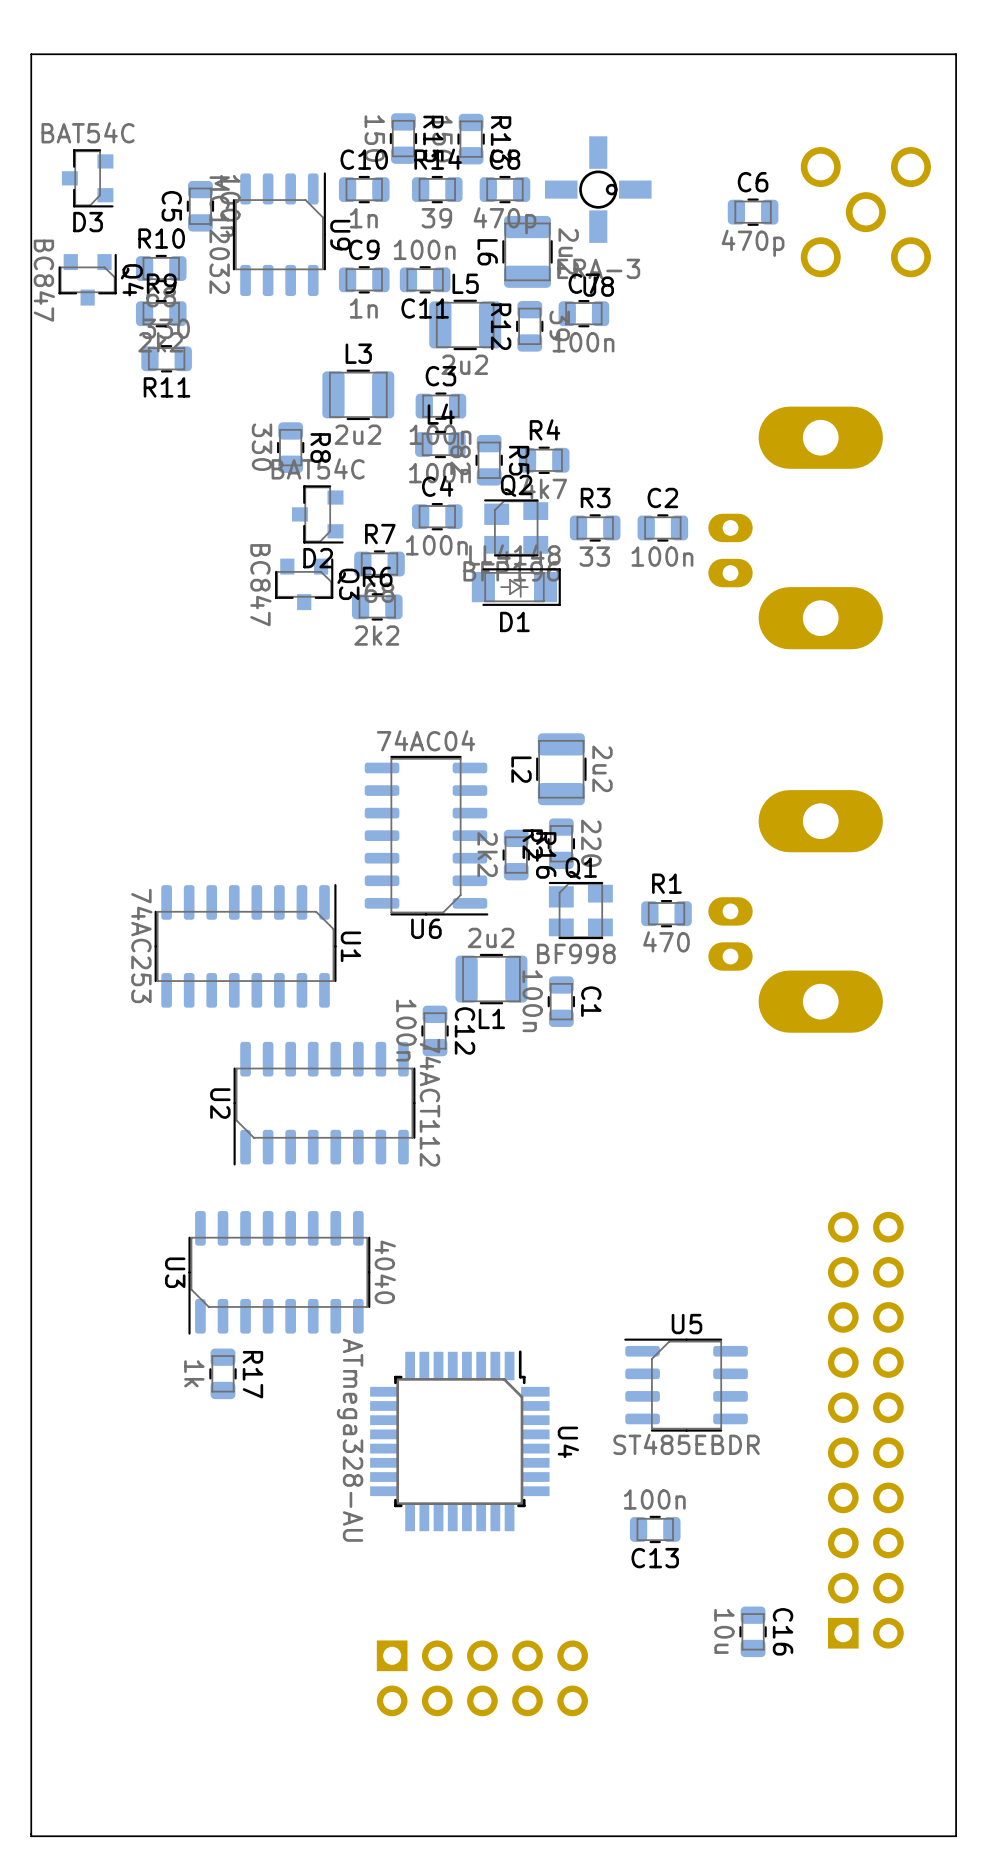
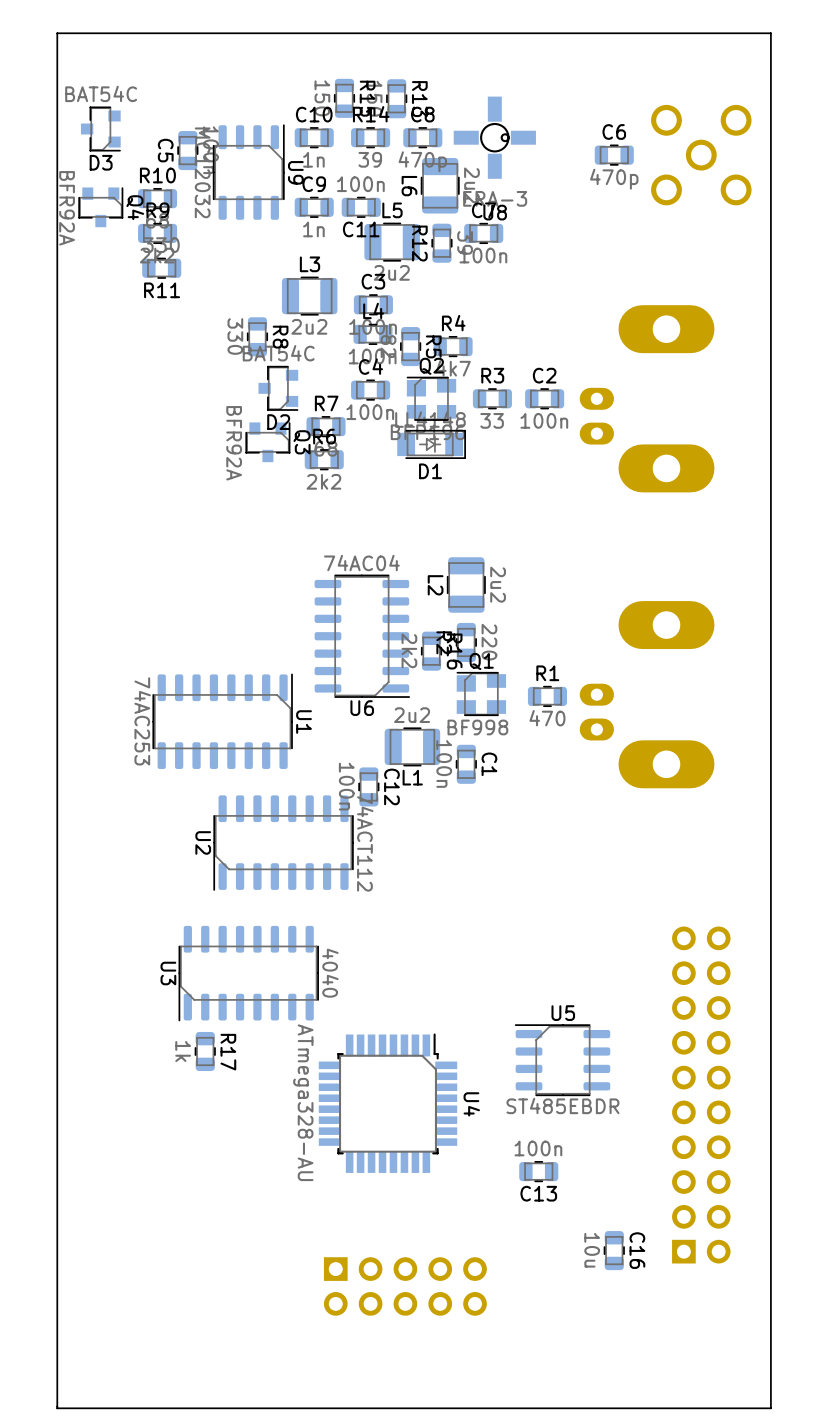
Q4 value: BC847 (44, 280) -> BFR92A (67, 208)
Q3 value: BC847 (260, 585) -> BFR92A (234, 443)

